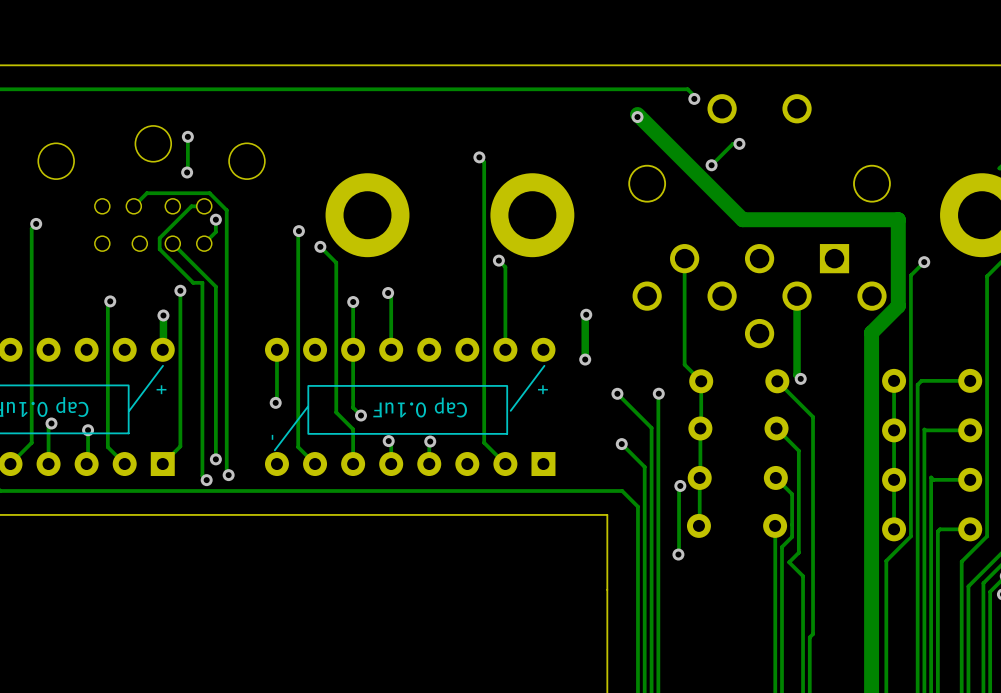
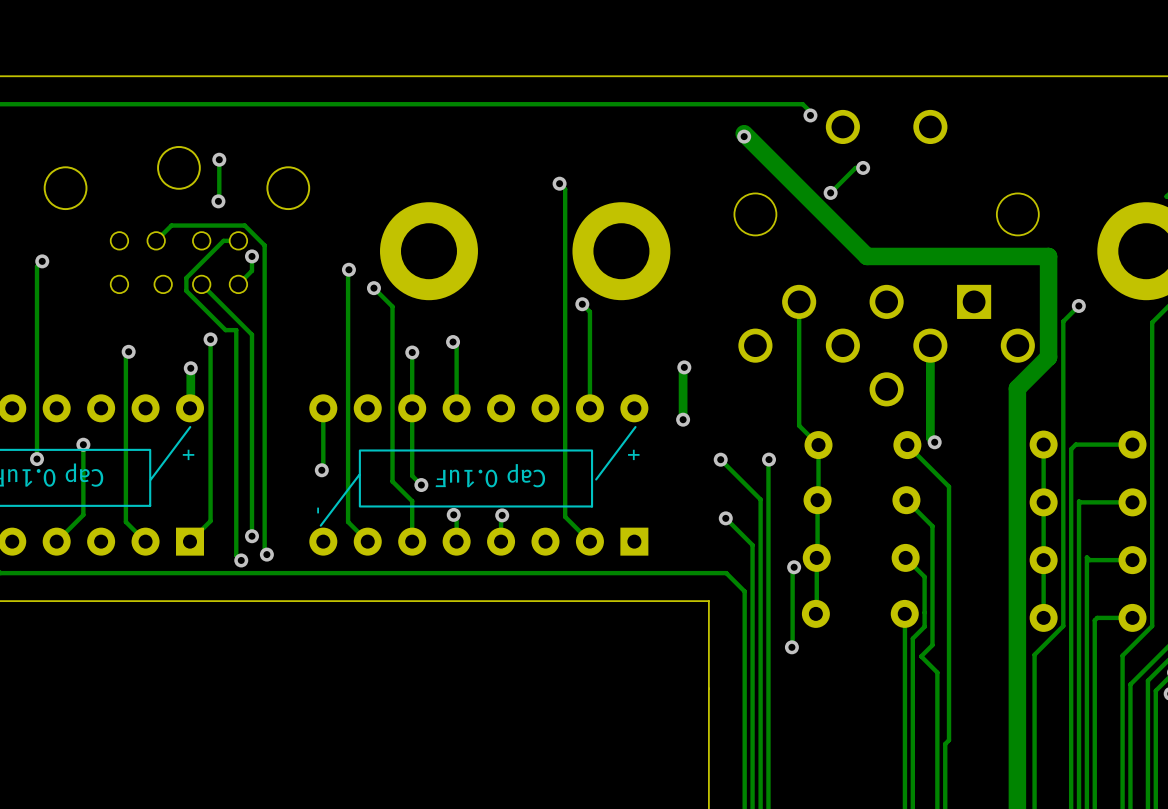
via: none -> (83, 444)
track: (31, 393) (31, 442) (10, 464) -> none
via: none -> (37, 459)
track: (51, 423) (48, 426) (48, 464) -> (83, 444) (83, 514) (56, 541)
via: (51, 423) -> none
track: (88, 430) (86, 464) -> none
via: (88, 430) -> none

